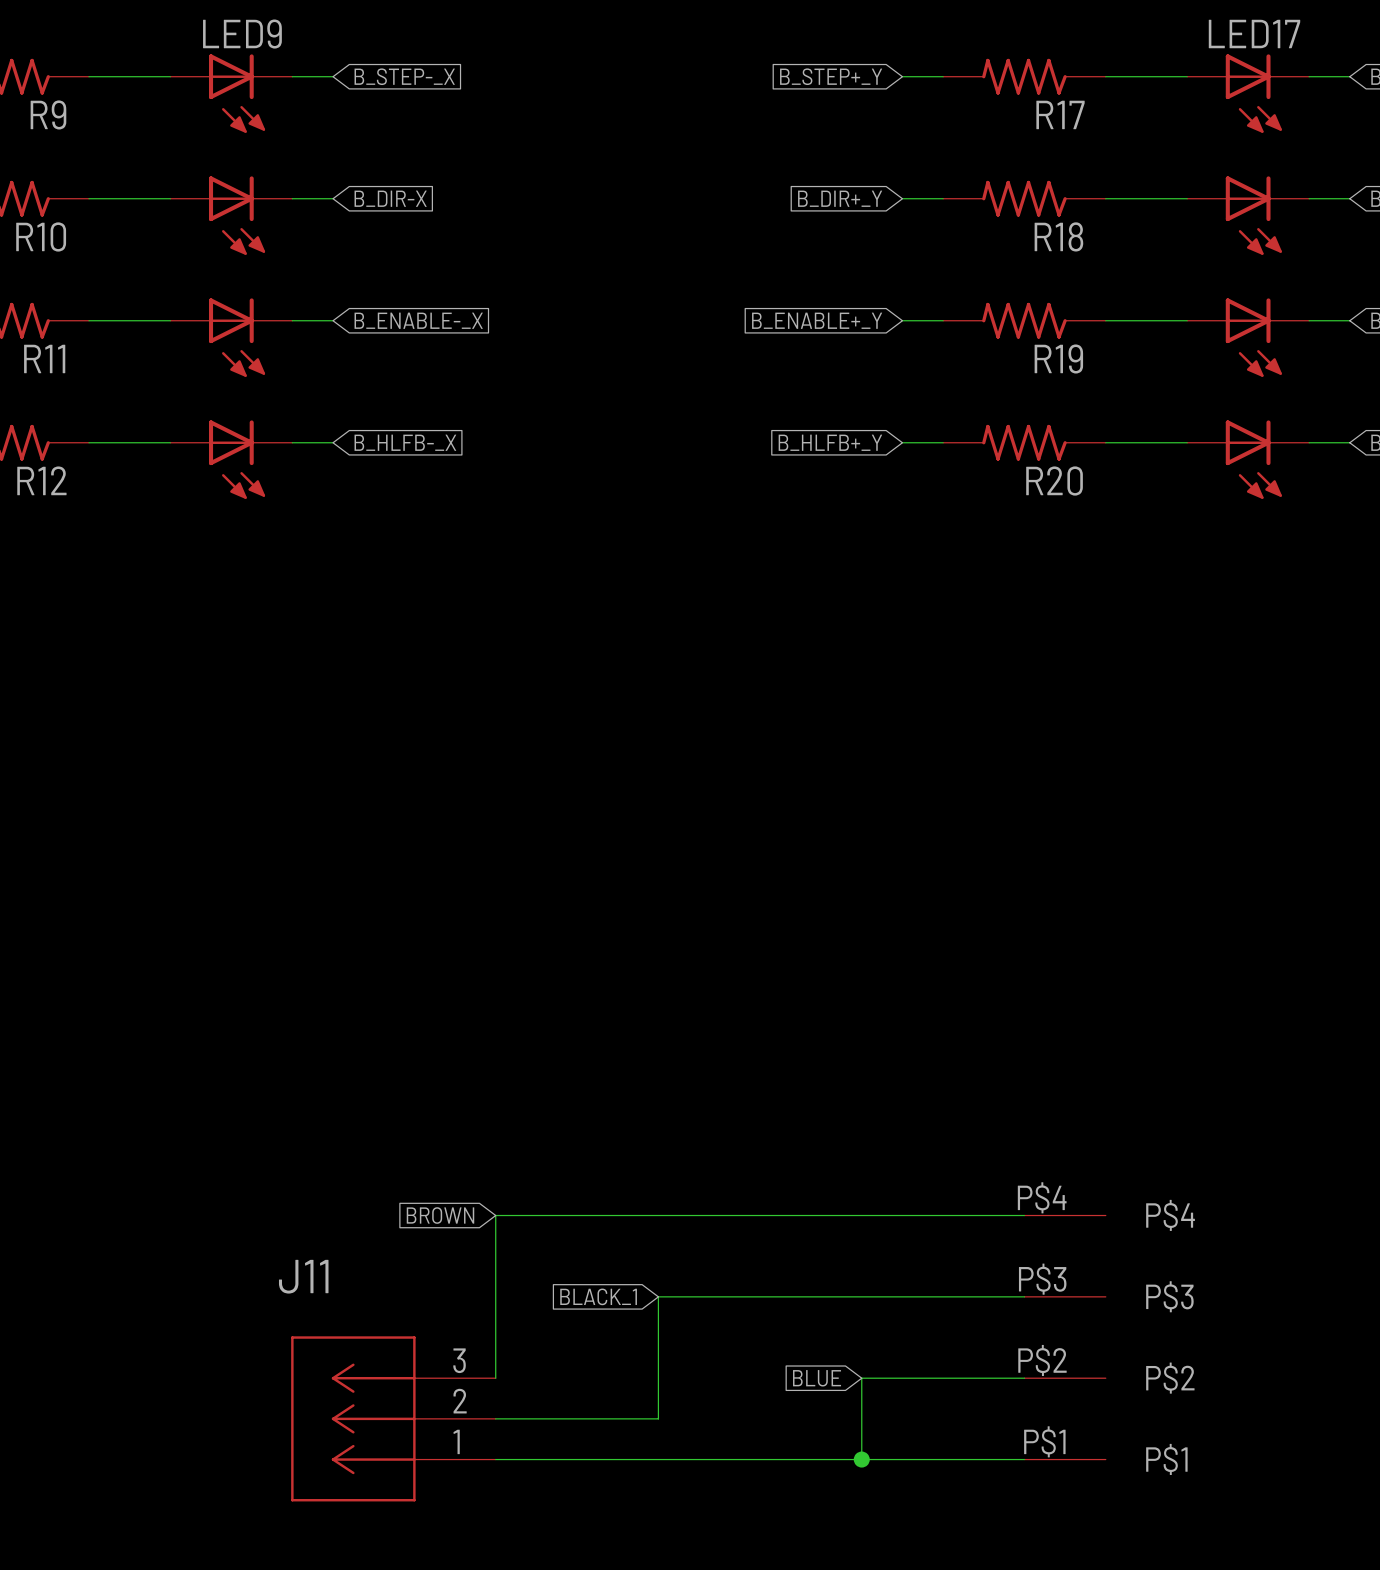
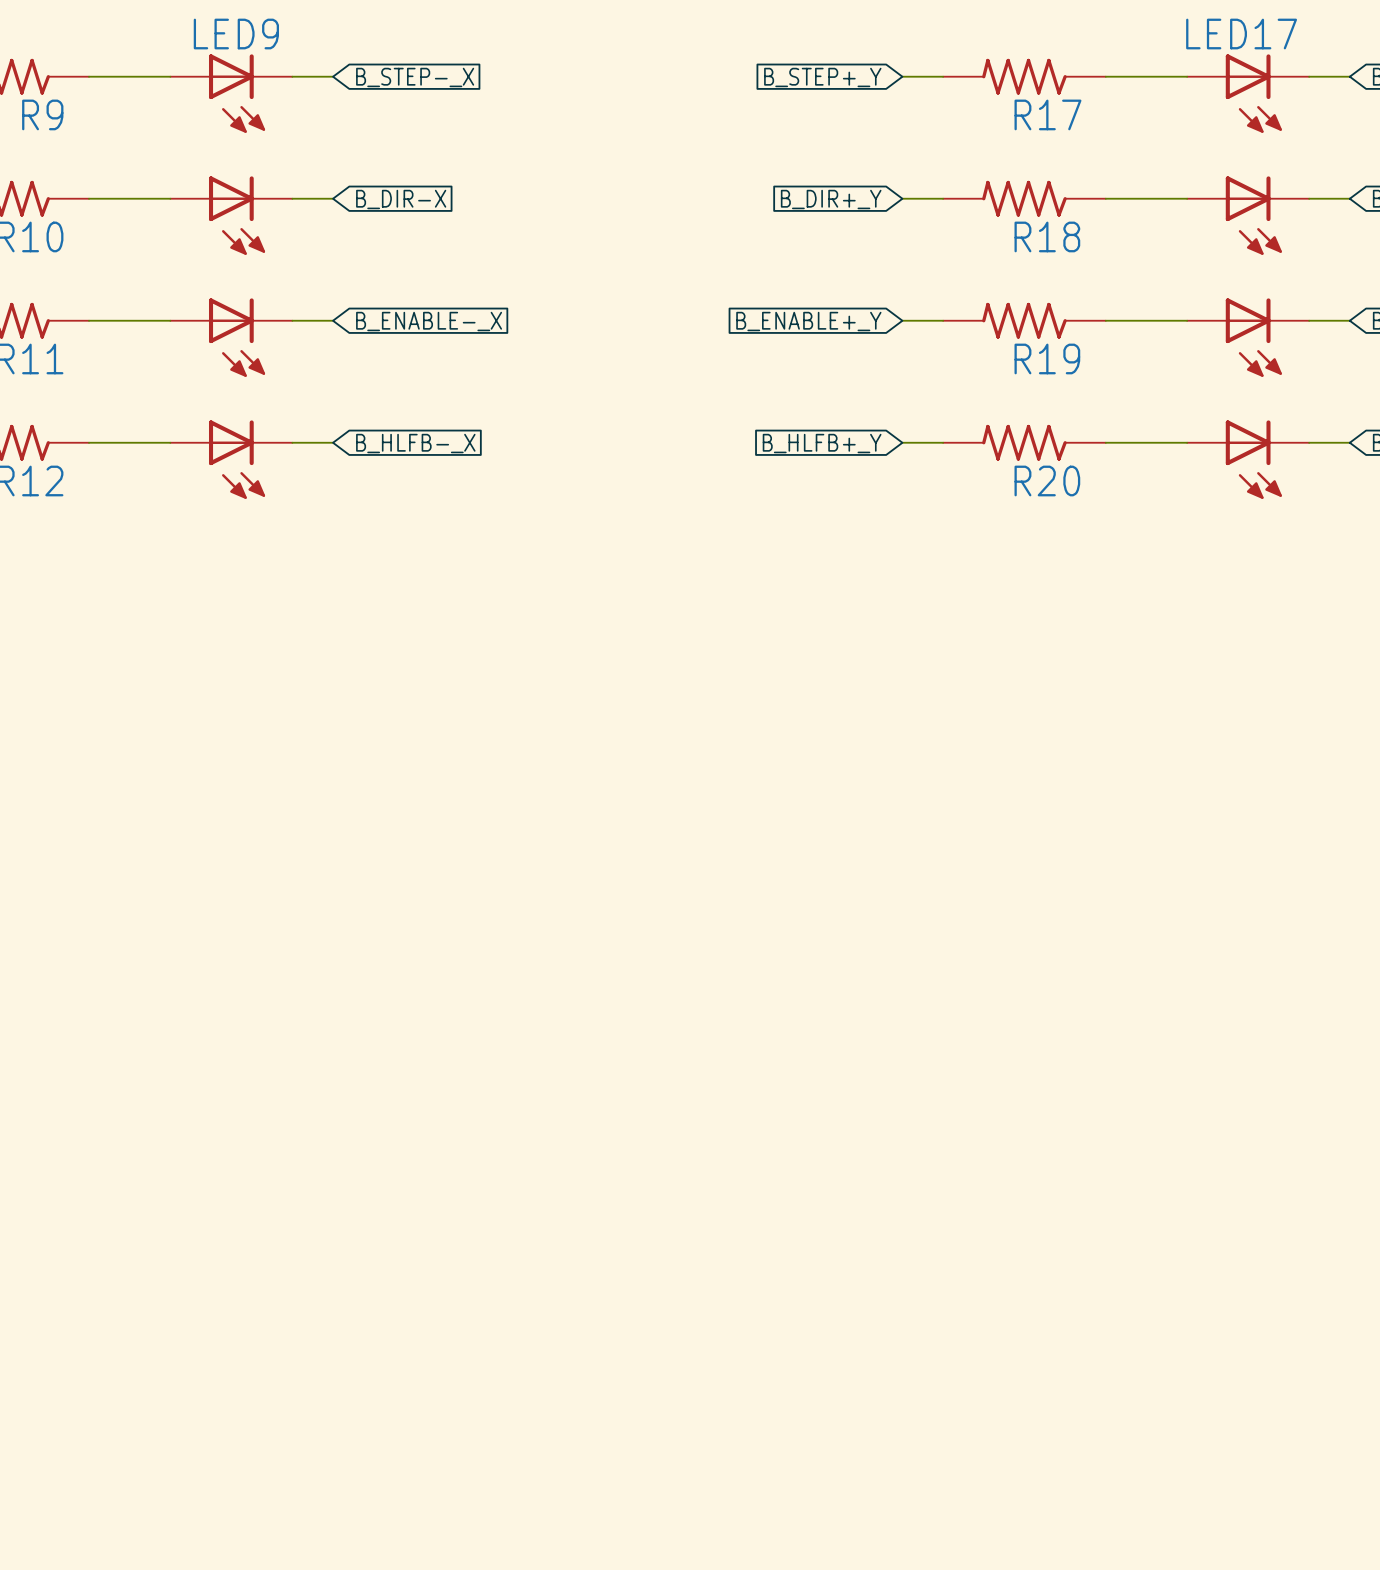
global label: BROWN (440, 1215) -> none
wire: (1024, 1215) (495, 1215) (495, 1378) -> none
global label: BLACK_1 (598, 1296) -> none
wire: (1024, 1296) (658, 1296) (658, 1418) (495, 1418) -> none
part: (1065, 1337) -> none
global label: BLUE (817, 1378) -> none
wire: (1024, 1378) (861, 1378) (861, 1459) -> none
J11: (393, 1418) -> none
wire: (495, 1459) (1024, 1459) -> none
junction: (861, 1459) -> none

